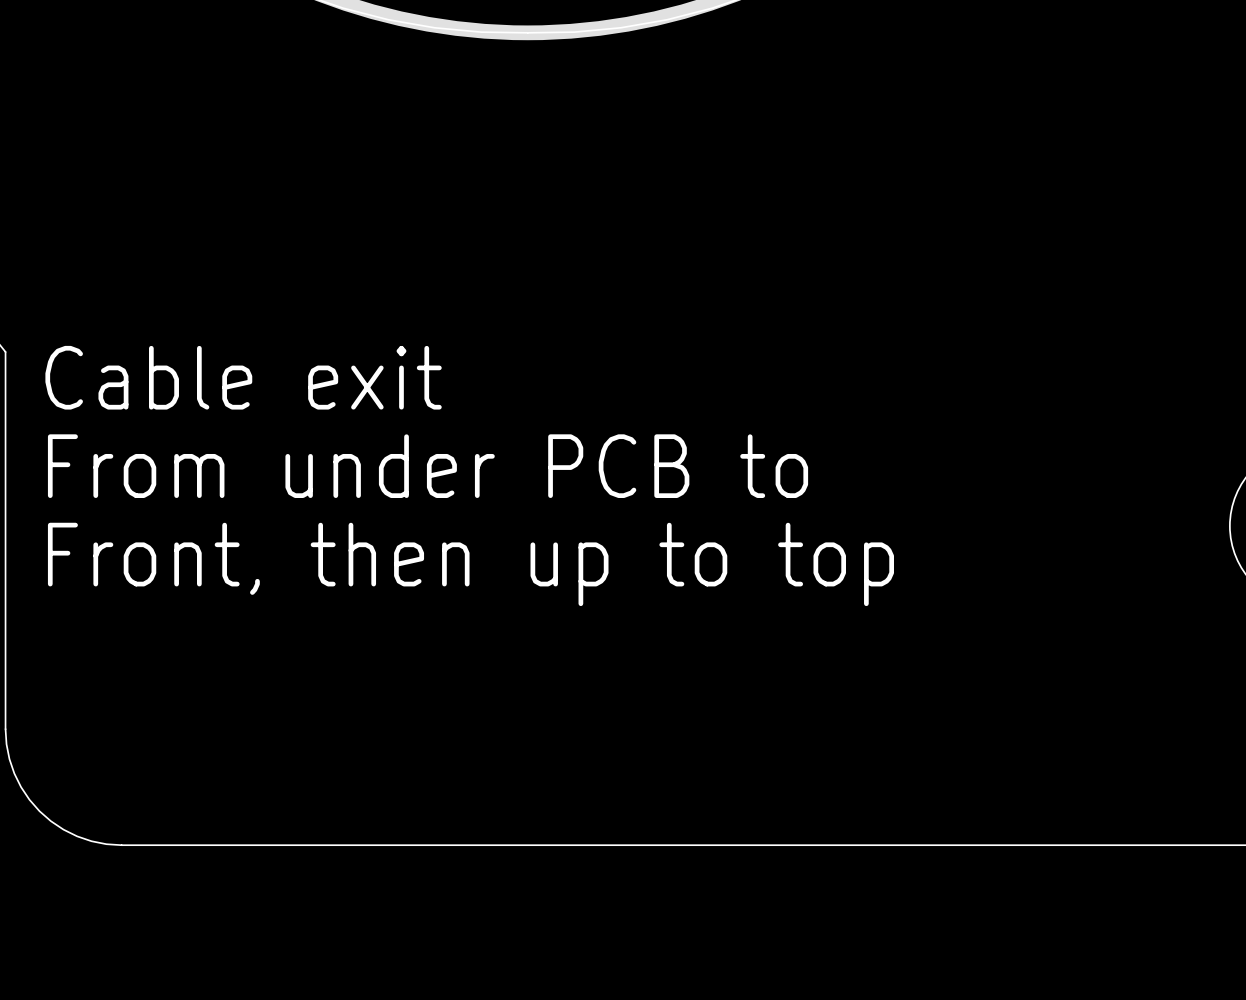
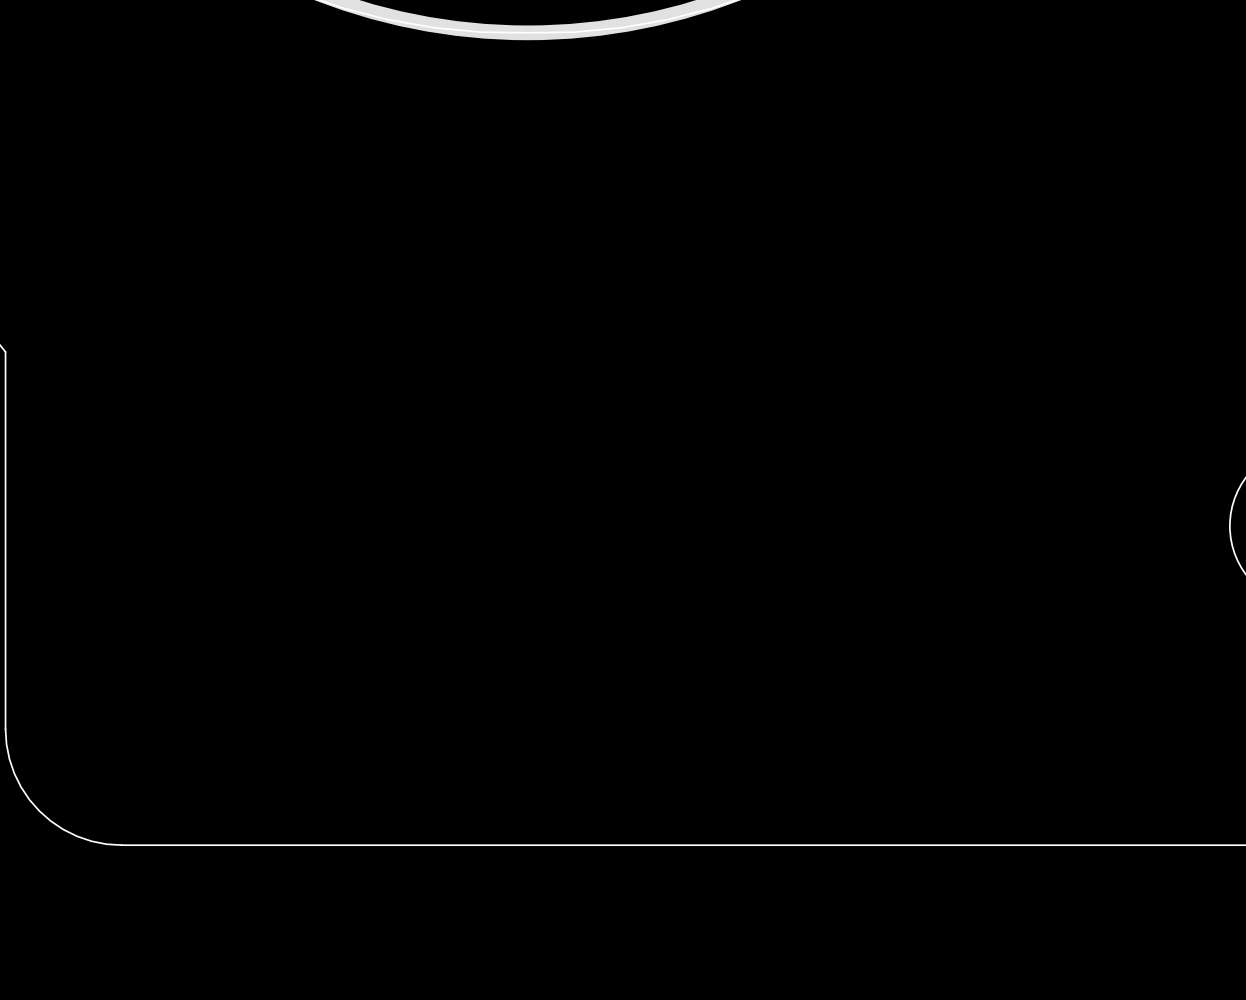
text: Cable exit (243, 377) -> none
text: From under PCB to (428, 466) -> none
text: Front, then up to top (470, 564) -> none

